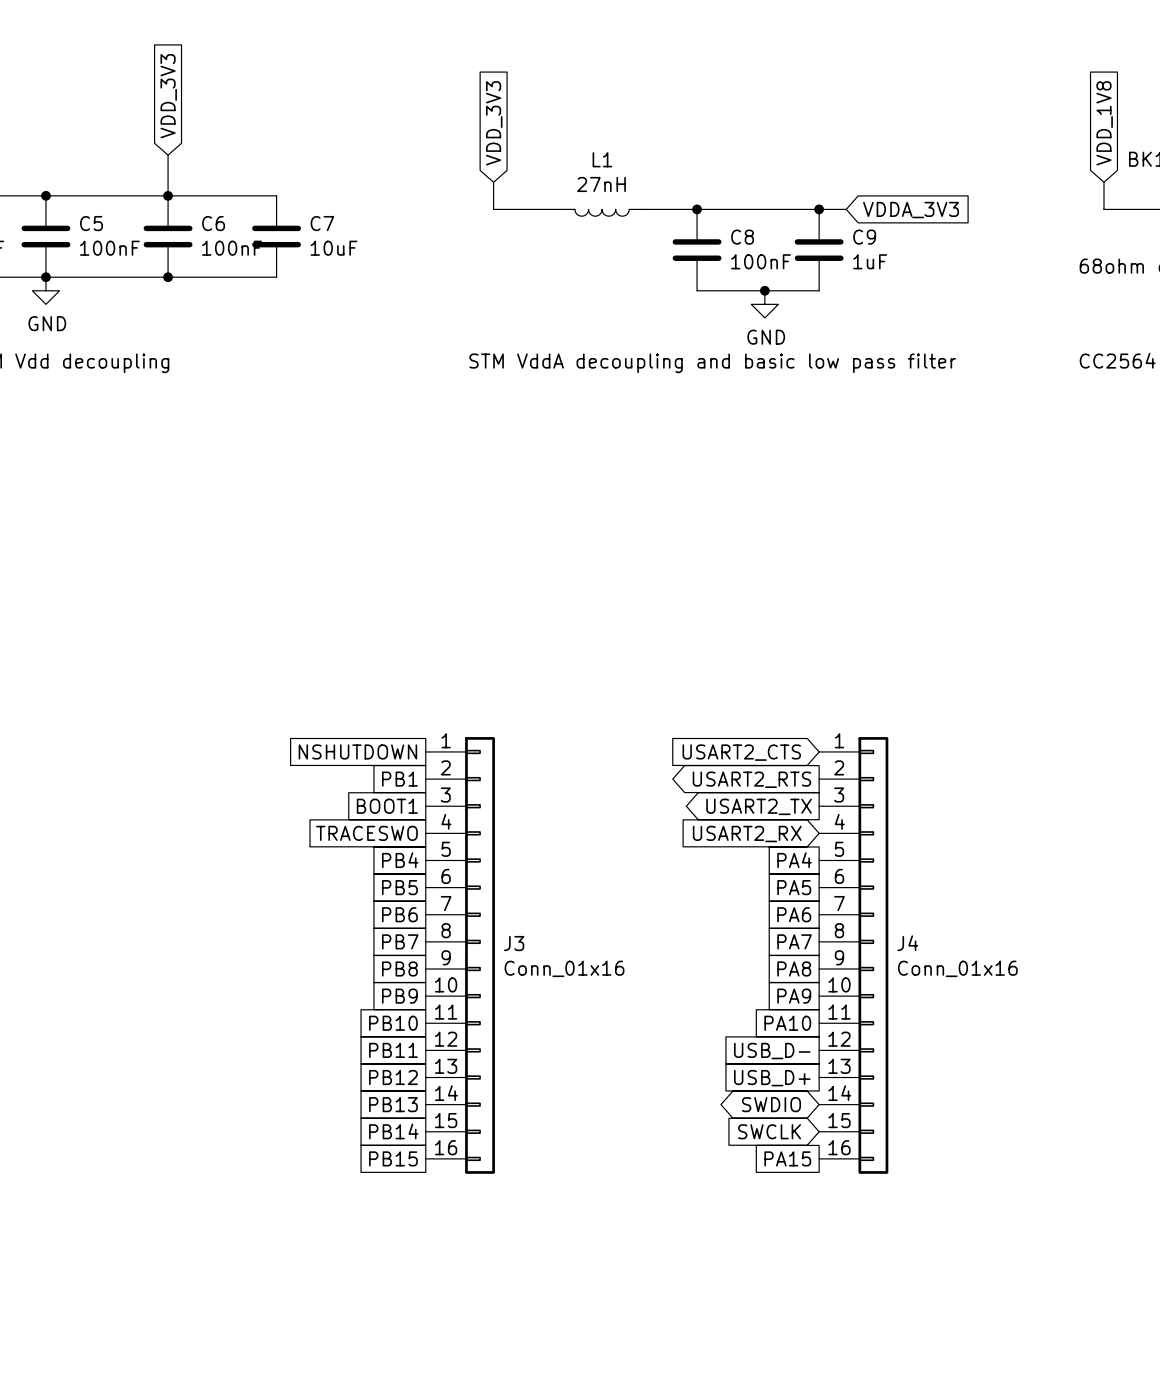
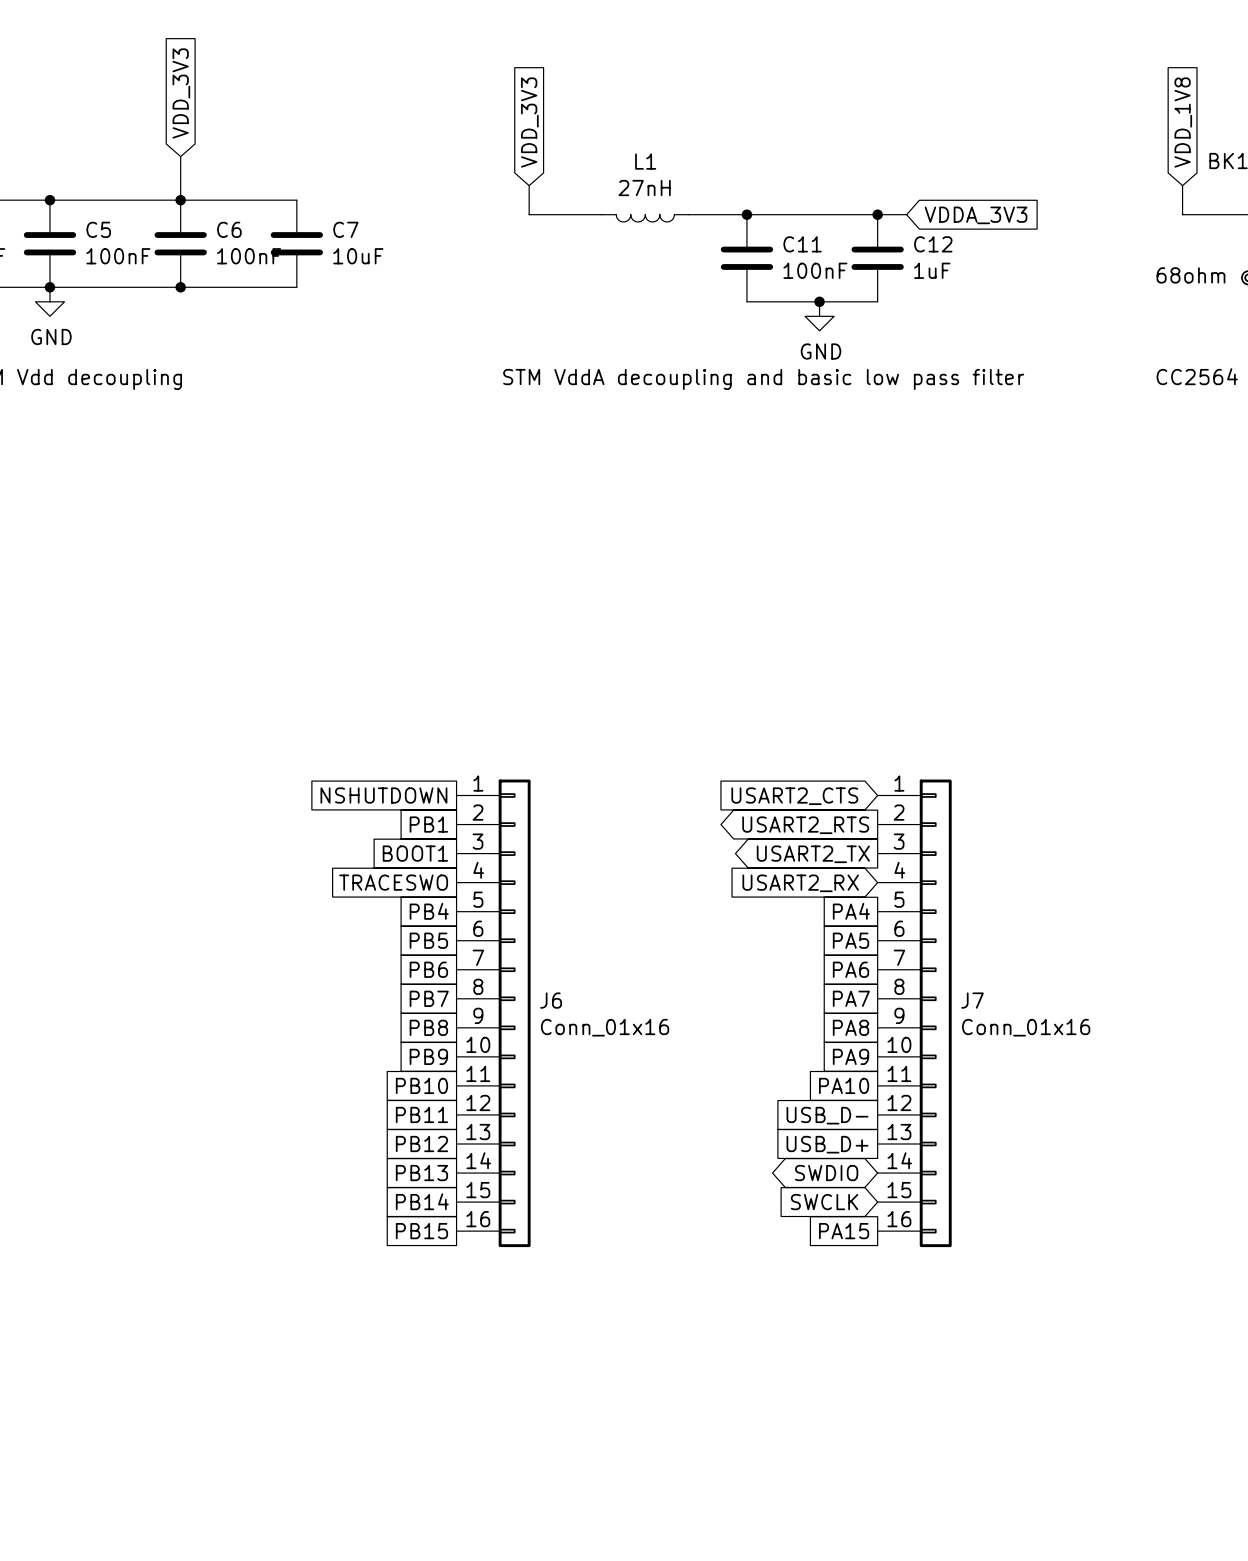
C8 name: C8 (742, 237) -> C11 (802, 244)
C9 name: C9 (864, 237) -> C12 (933, 244)
J3 name: J3 (514, 943) -> J6 (551, 1000)
J4 name: J4 (907, 943) -> J7 (972, 1000)

